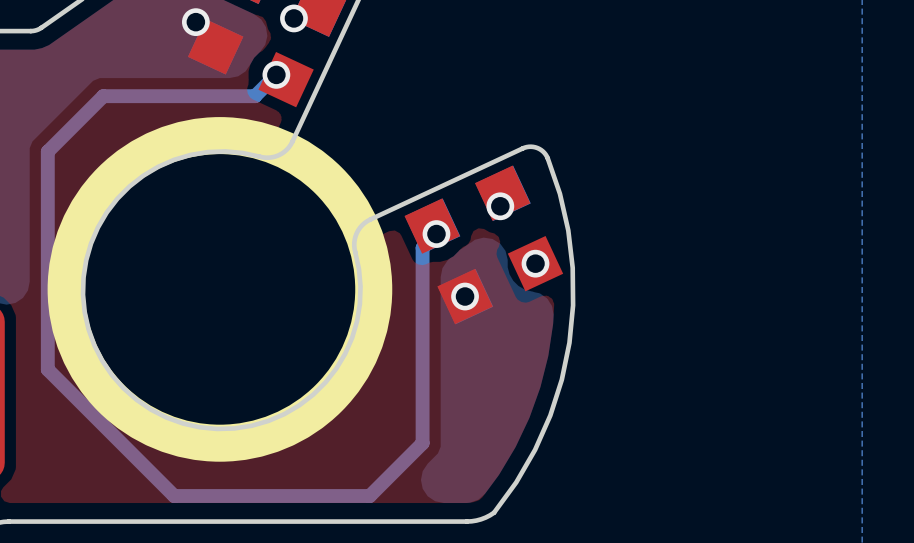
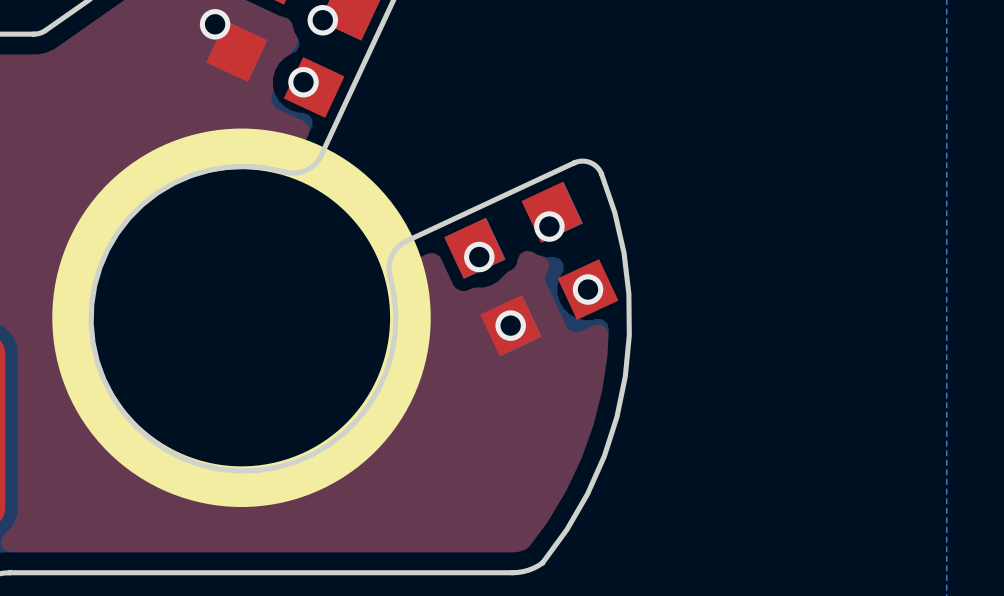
bottom track: (276, 74) (255, 96) (103, 96) (47, 151) (47, 369) (174, 496) (369, 496) (422, 443) (422, 247) (436, 234) -> none

